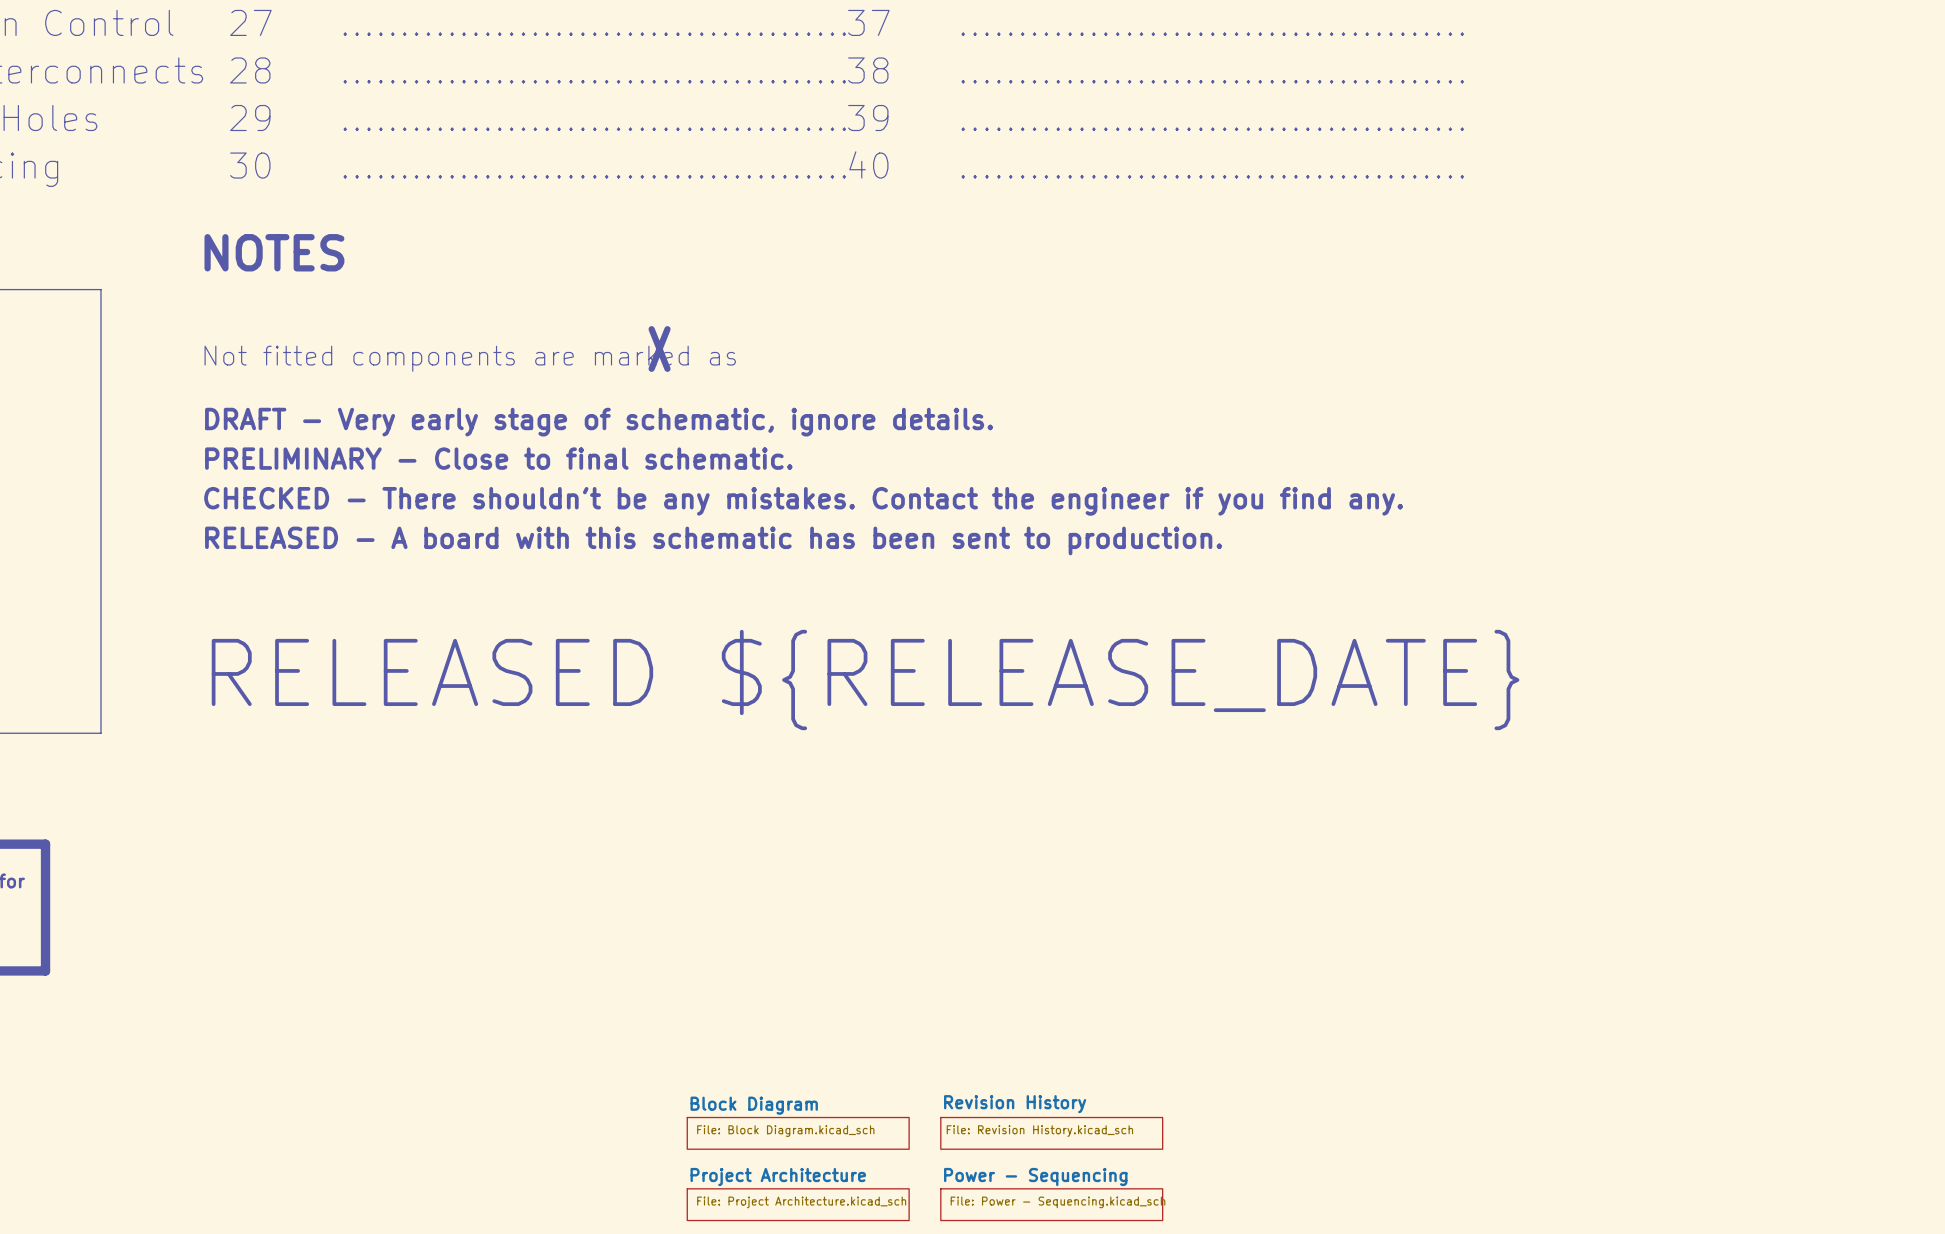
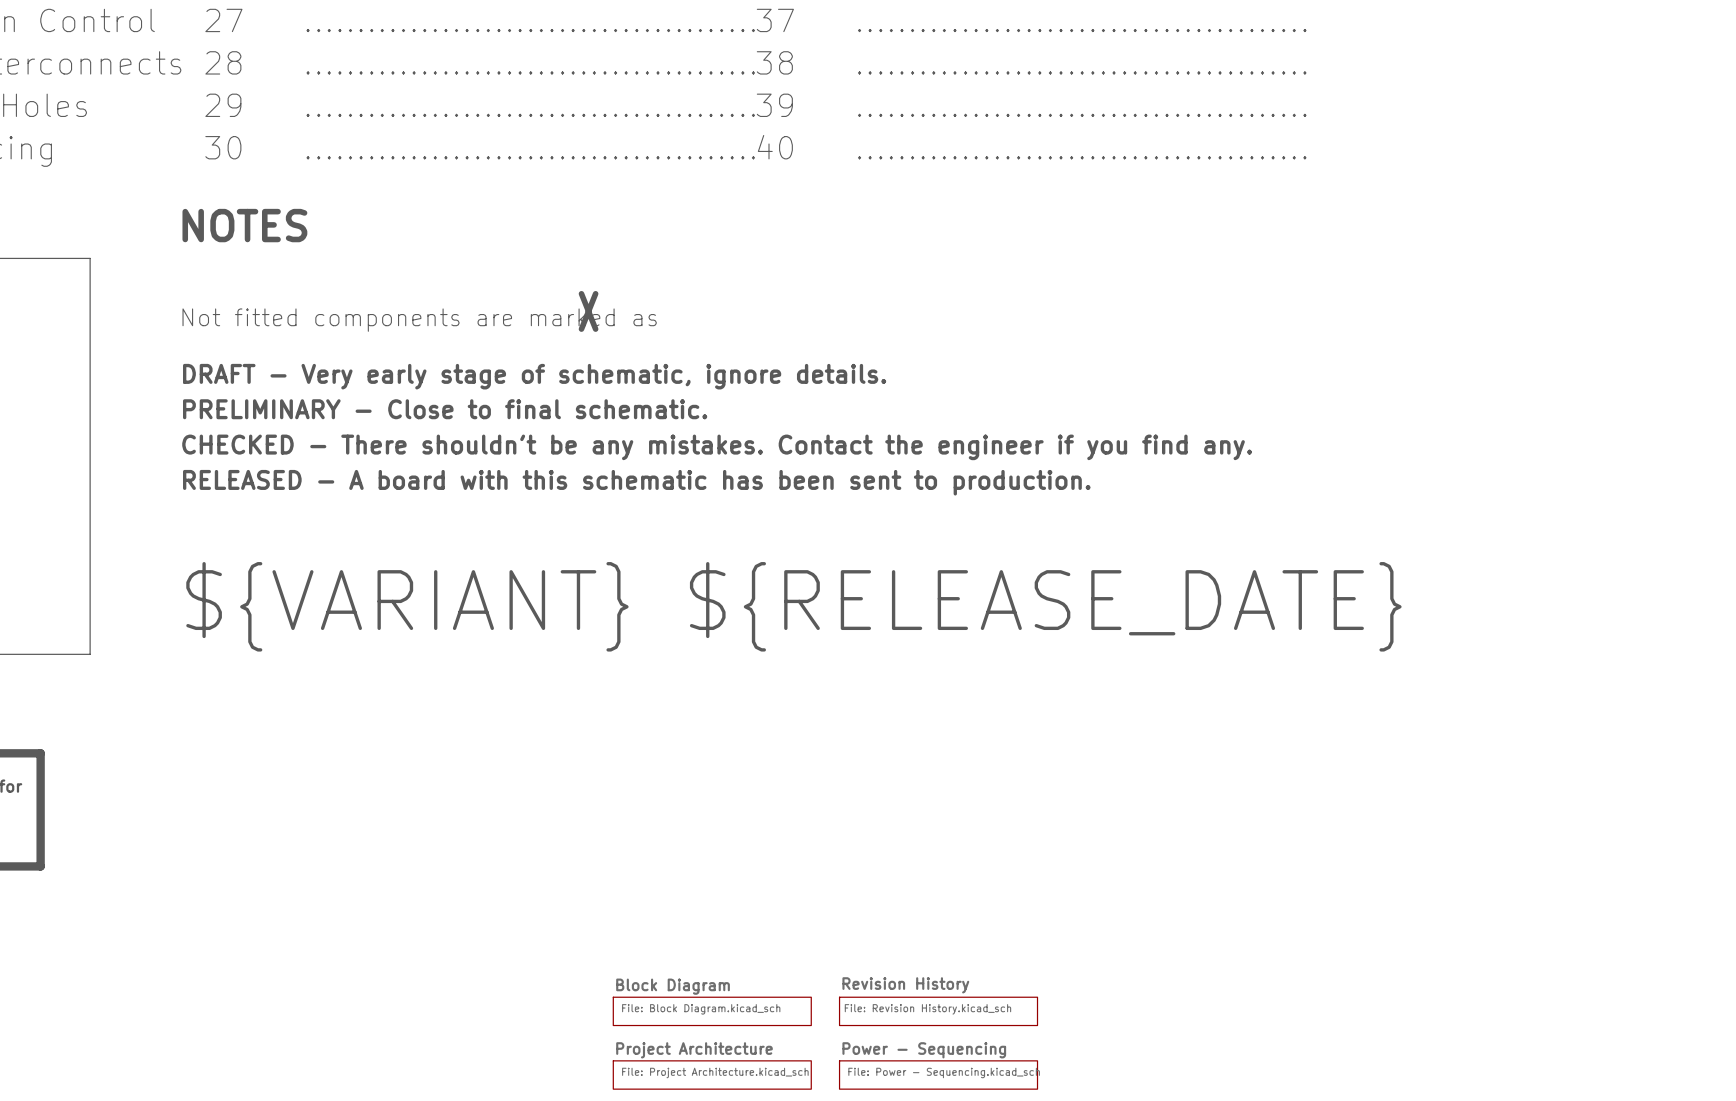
text: RELEASED ${RELEASE_DATE} (865, 679) -> ${VARIANT} ${RELEASE_DATE} (793, 606)

